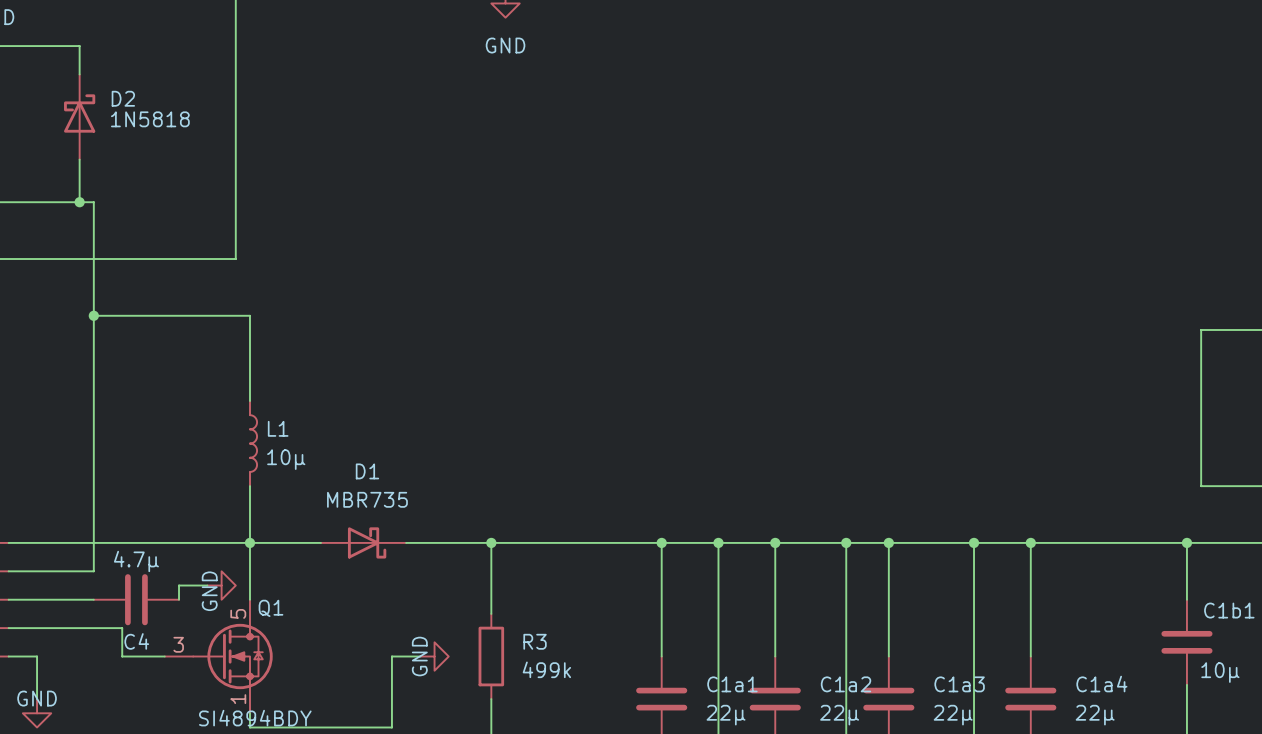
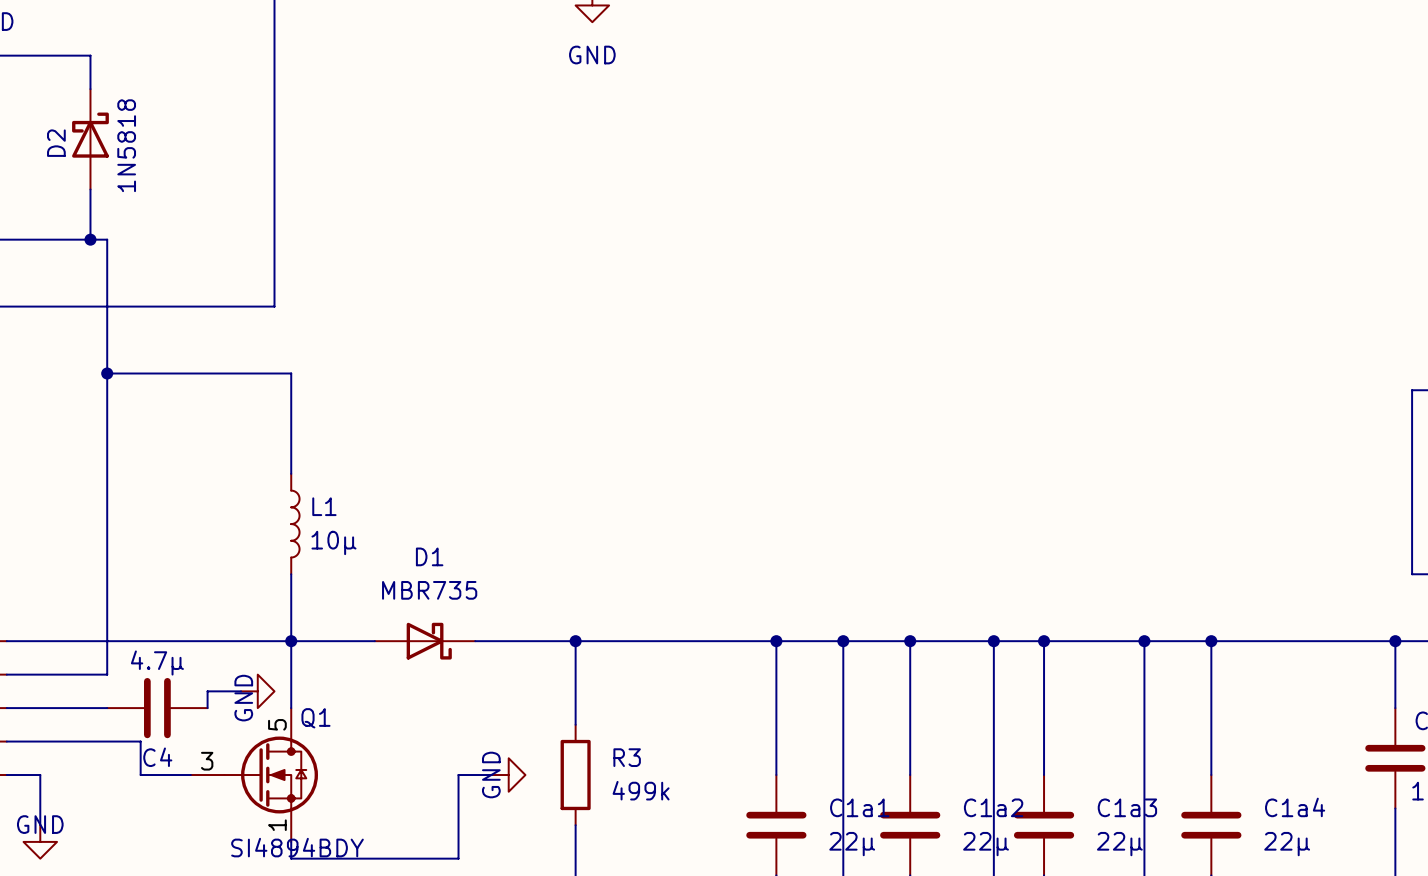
D2 name rotation: 0° (123, 98) -> 90° counterclockwise (56, 143)
D2 name position: D2 (123, 98) -> D2 (56, 143)
D2 value rotation: 0° (150, 119) -> 90° counterclockwise (126, 145)

